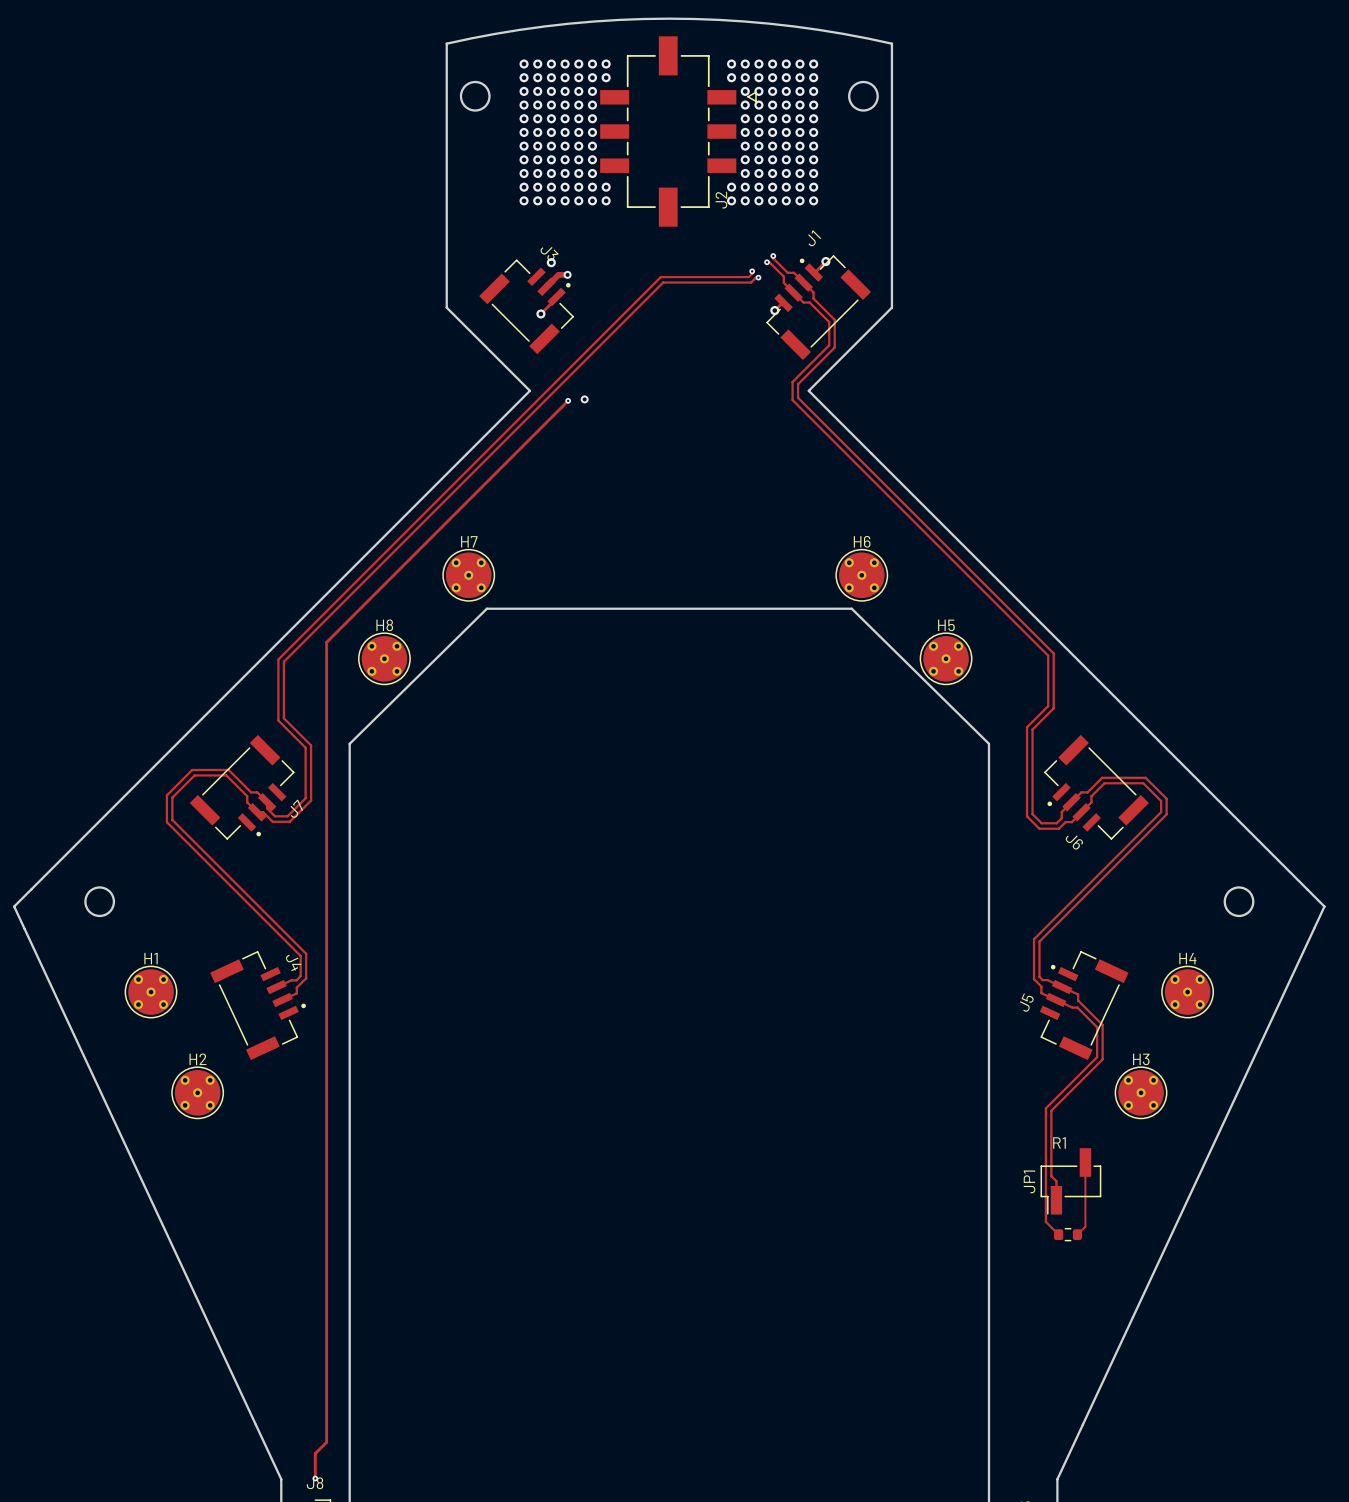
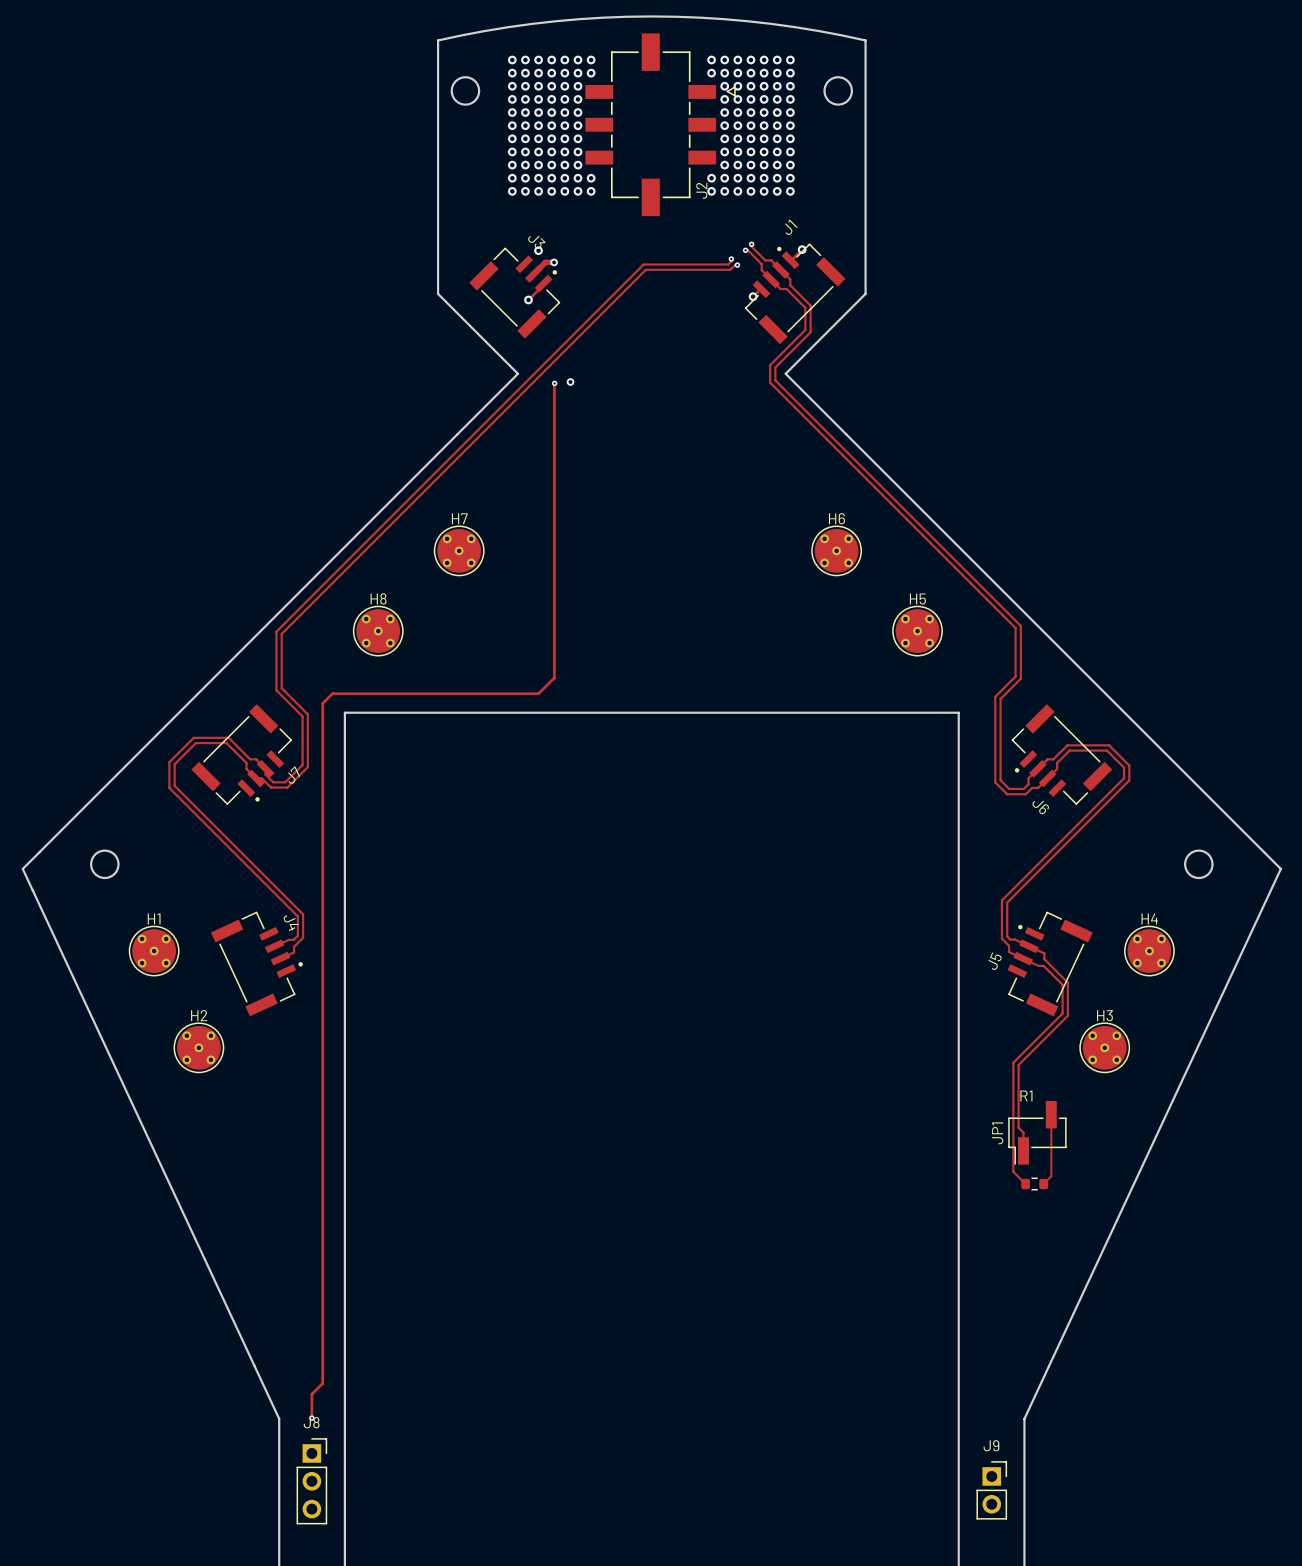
track: (567, 401) (326, 642) (326, 734) -> (554, 383) (554, 677) (538, 693) (332, 693) (322, 703)
board edge: (349, 743) (486, 608) (851, 608) (988, 743) -> (344, 712) (958, 712)

